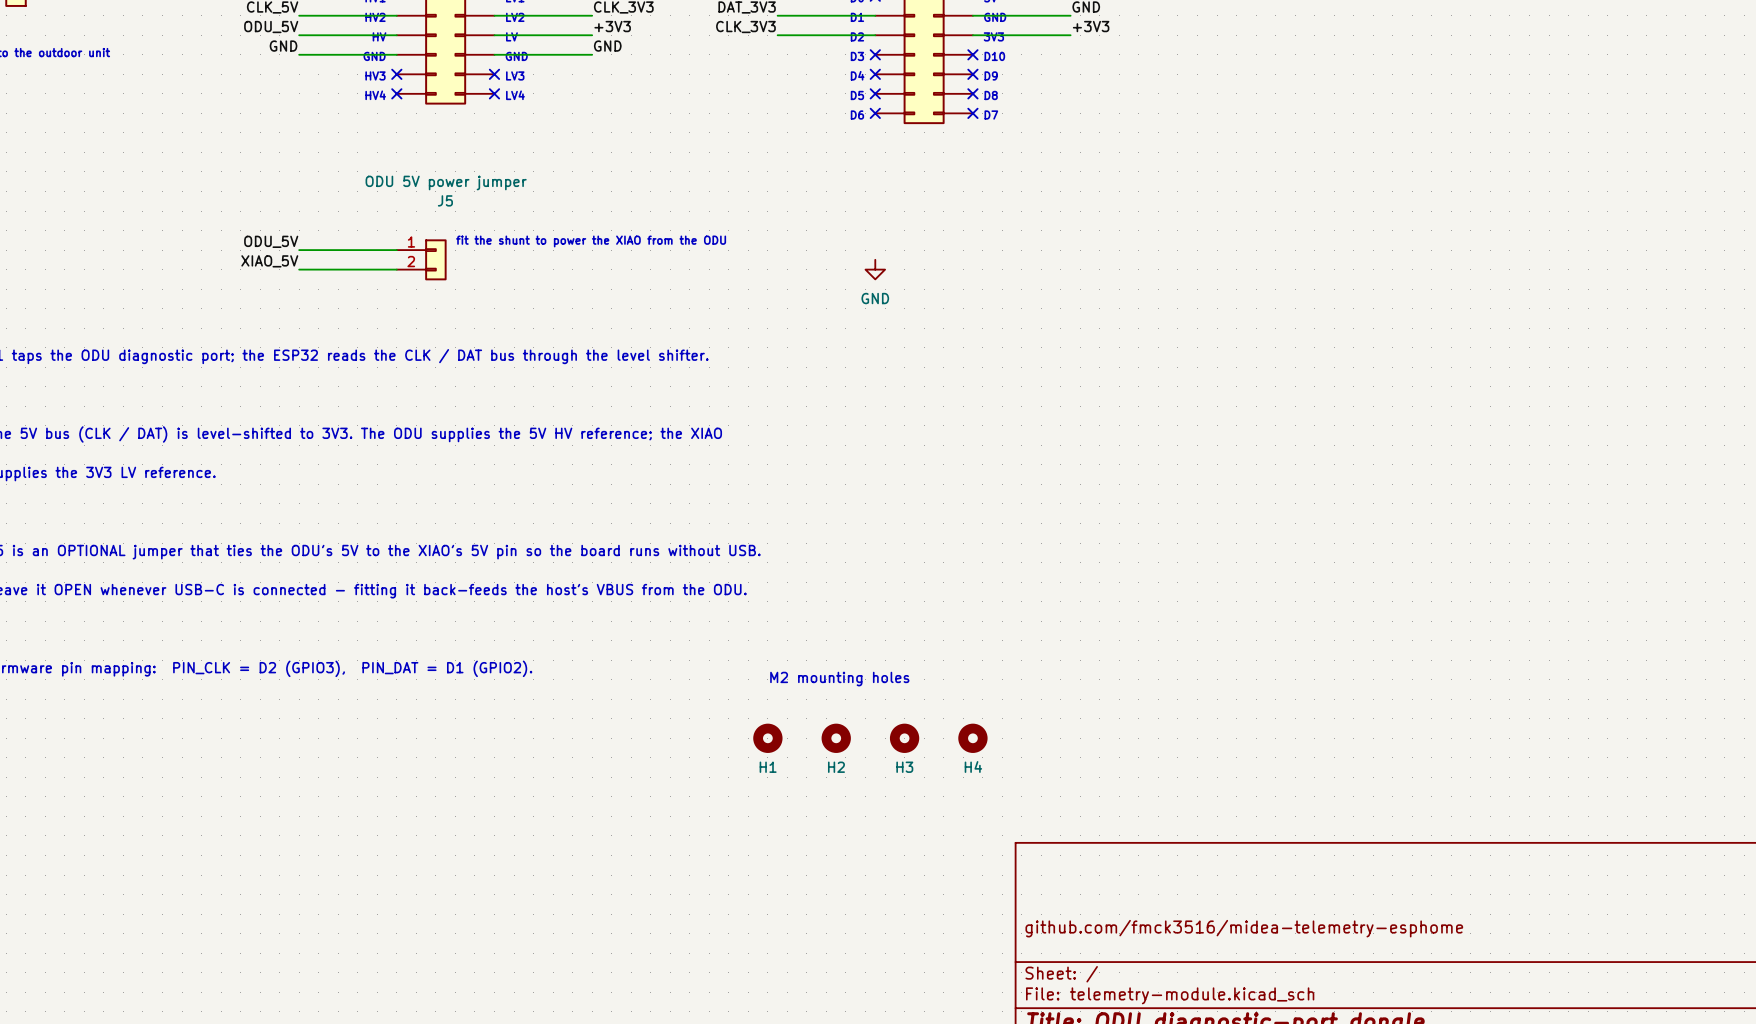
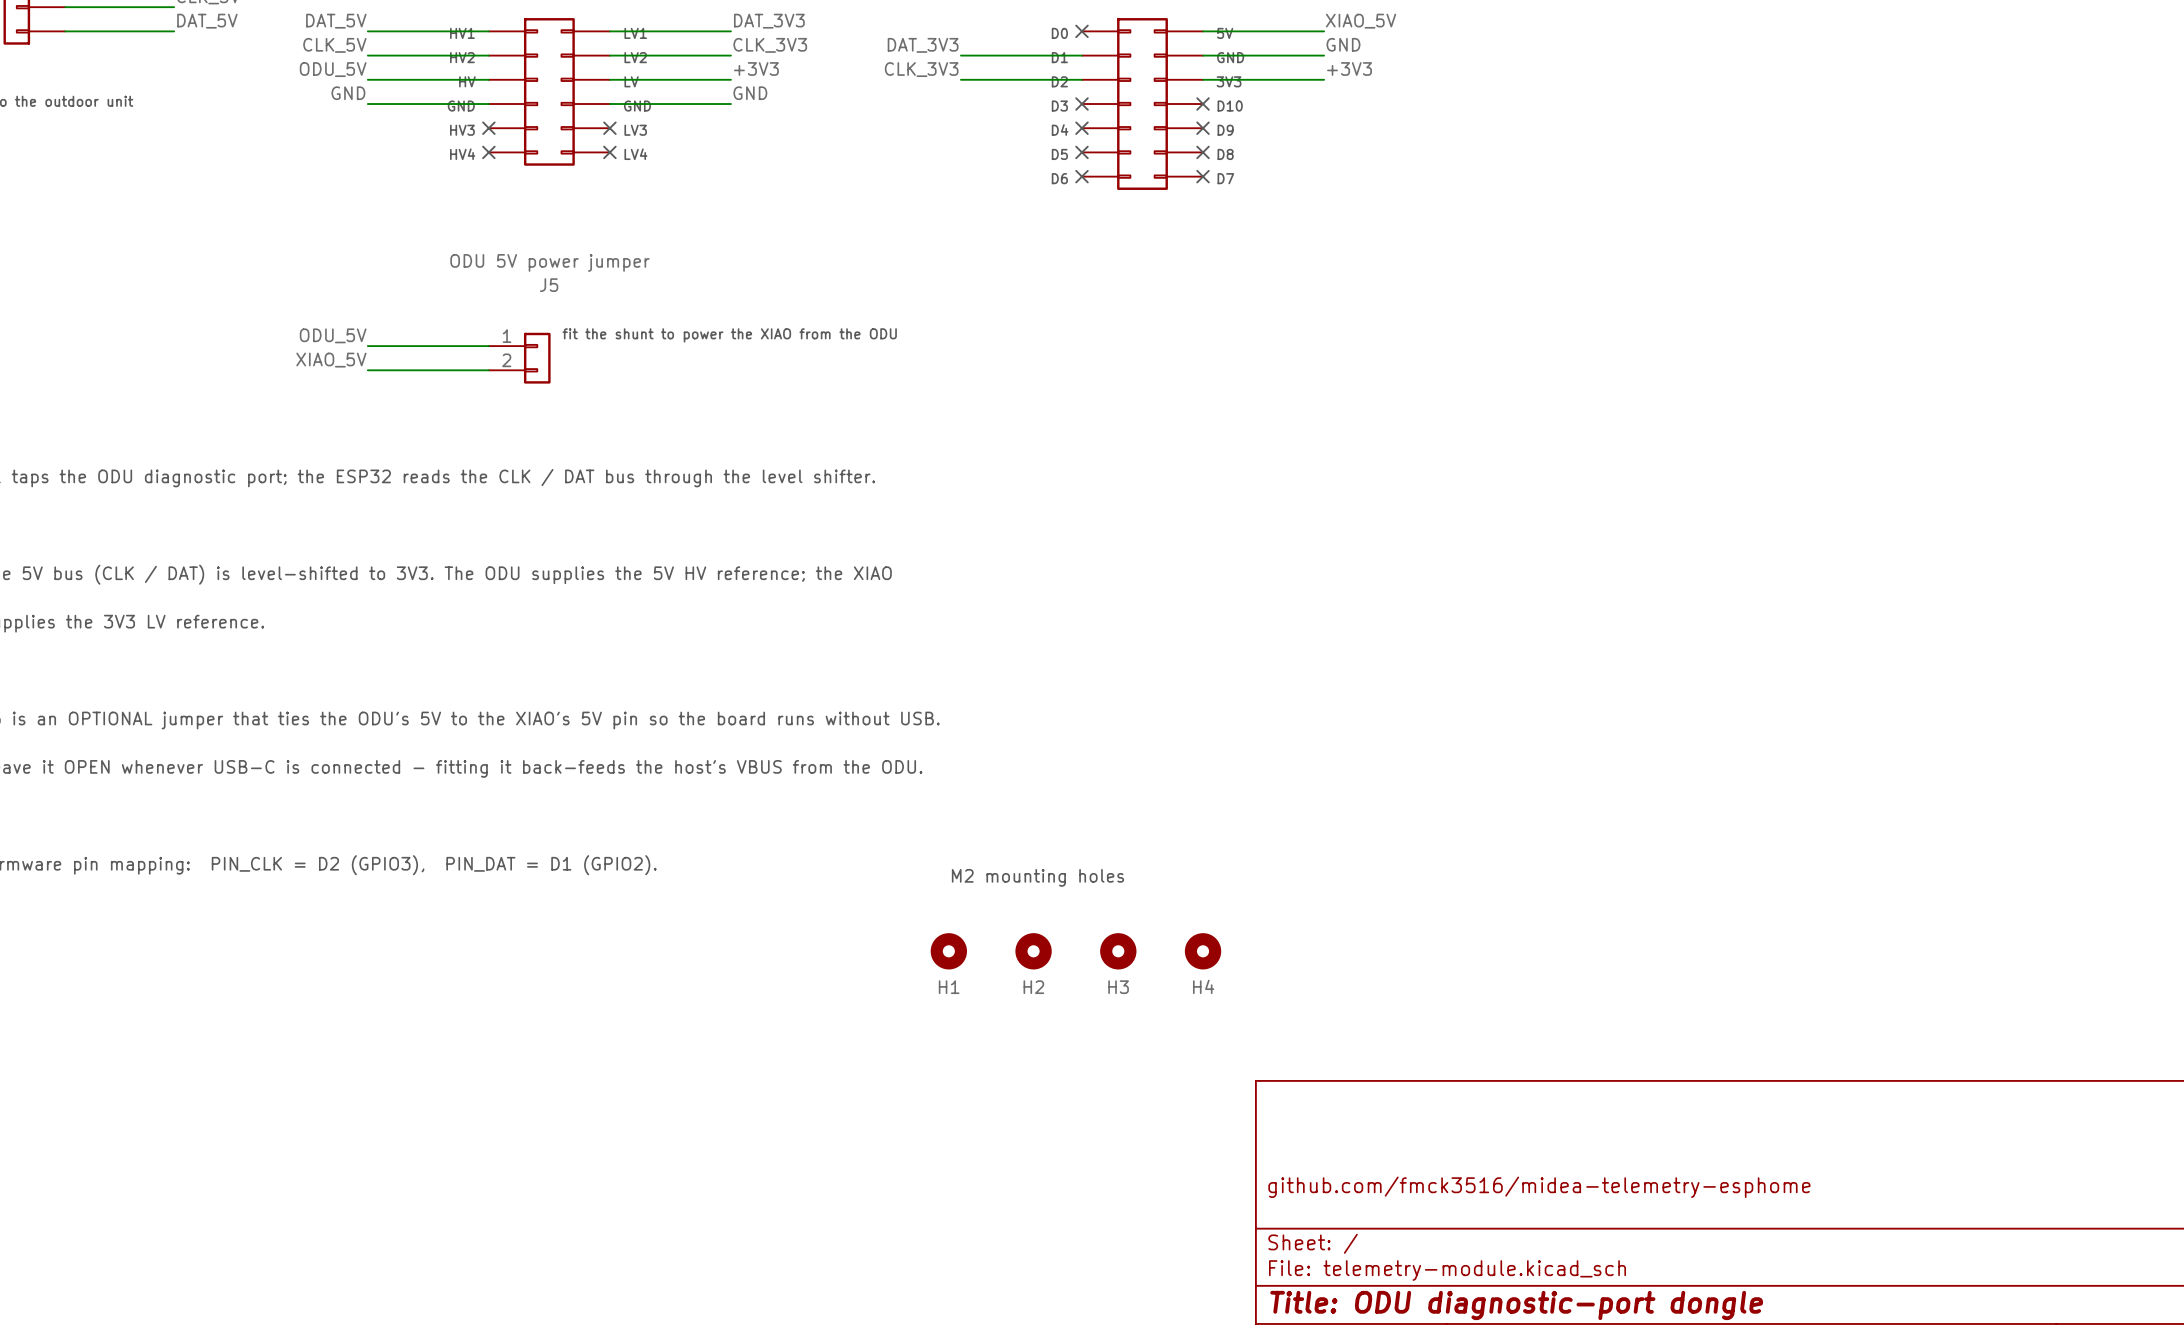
power symbol: GND (875, 269) -> none

